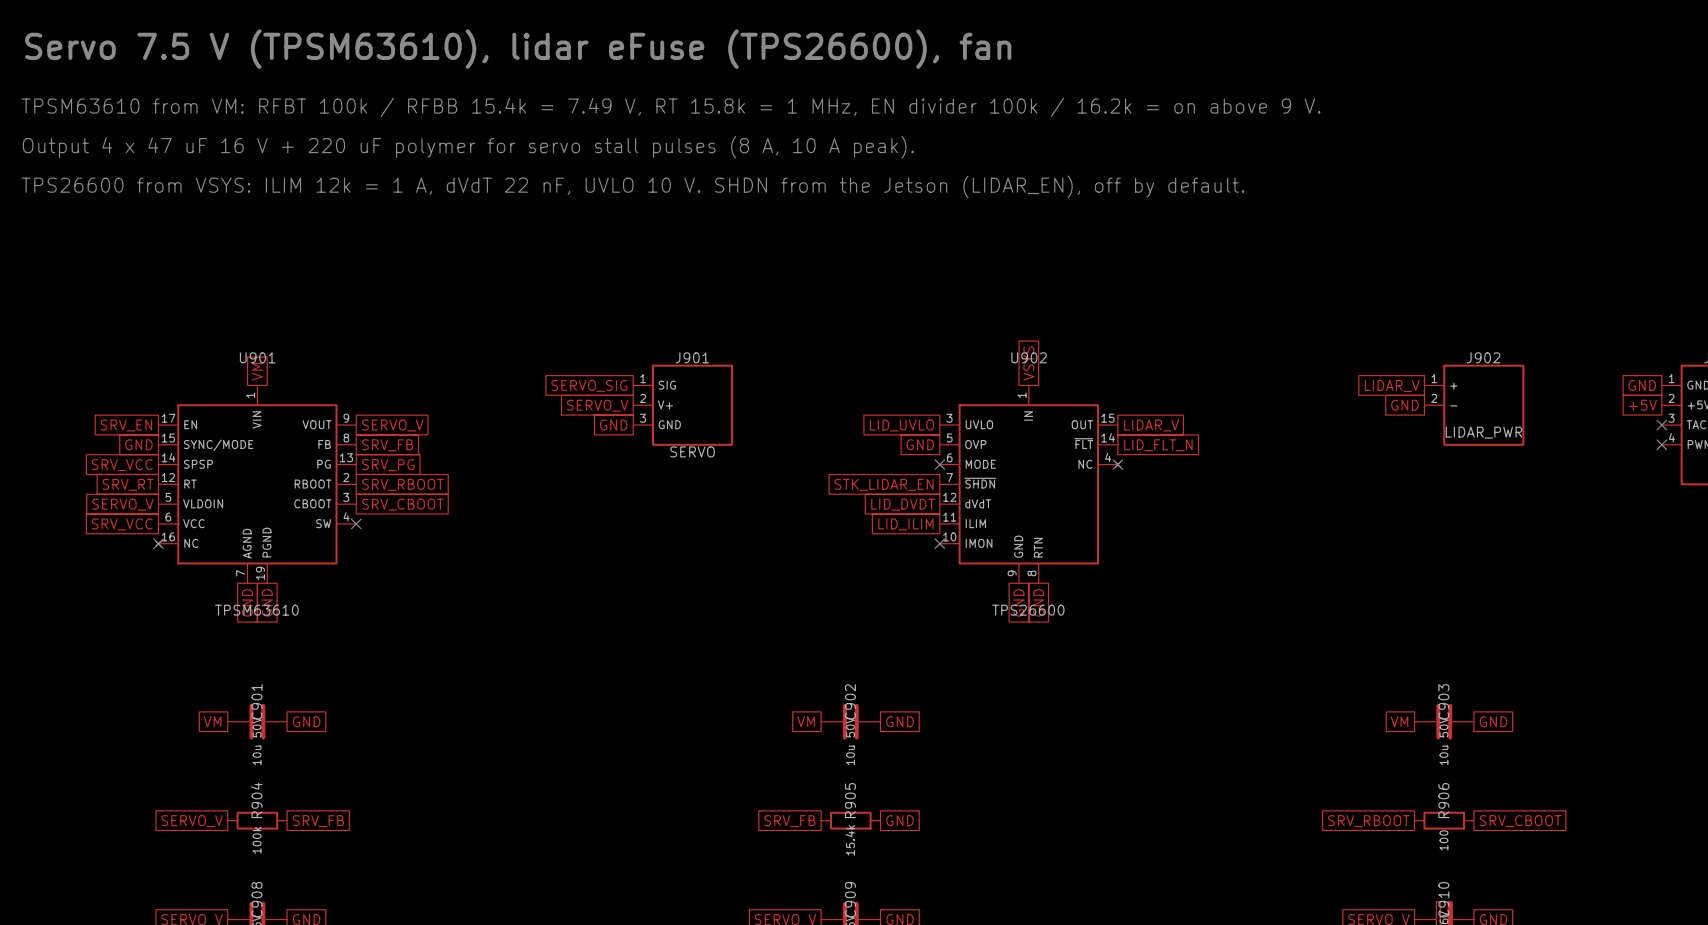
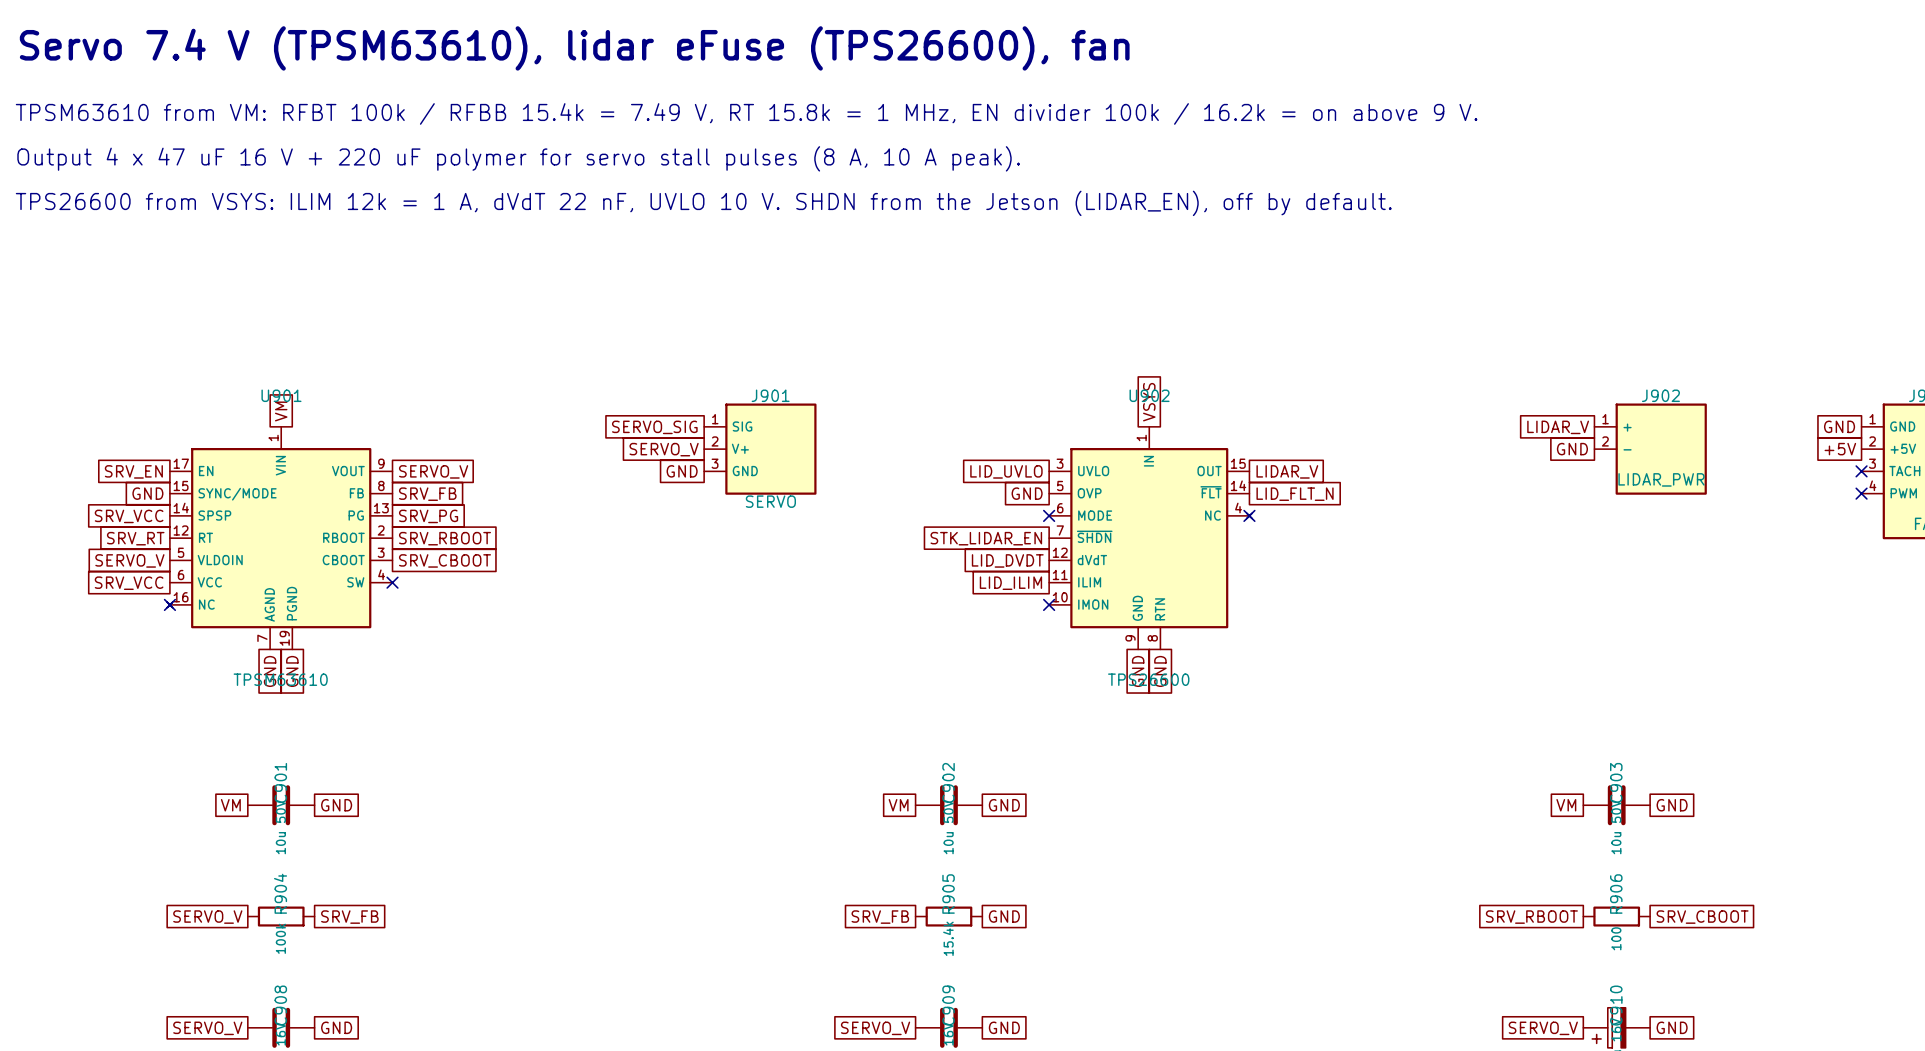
text: Servo 7.5 V (TPSM63610), lidar eFuse (TPS26600), fan (518, 49) -> Servo 7.4 V (TPSM63610), lidar eFuse (TPS26600), fan (574, 48)

